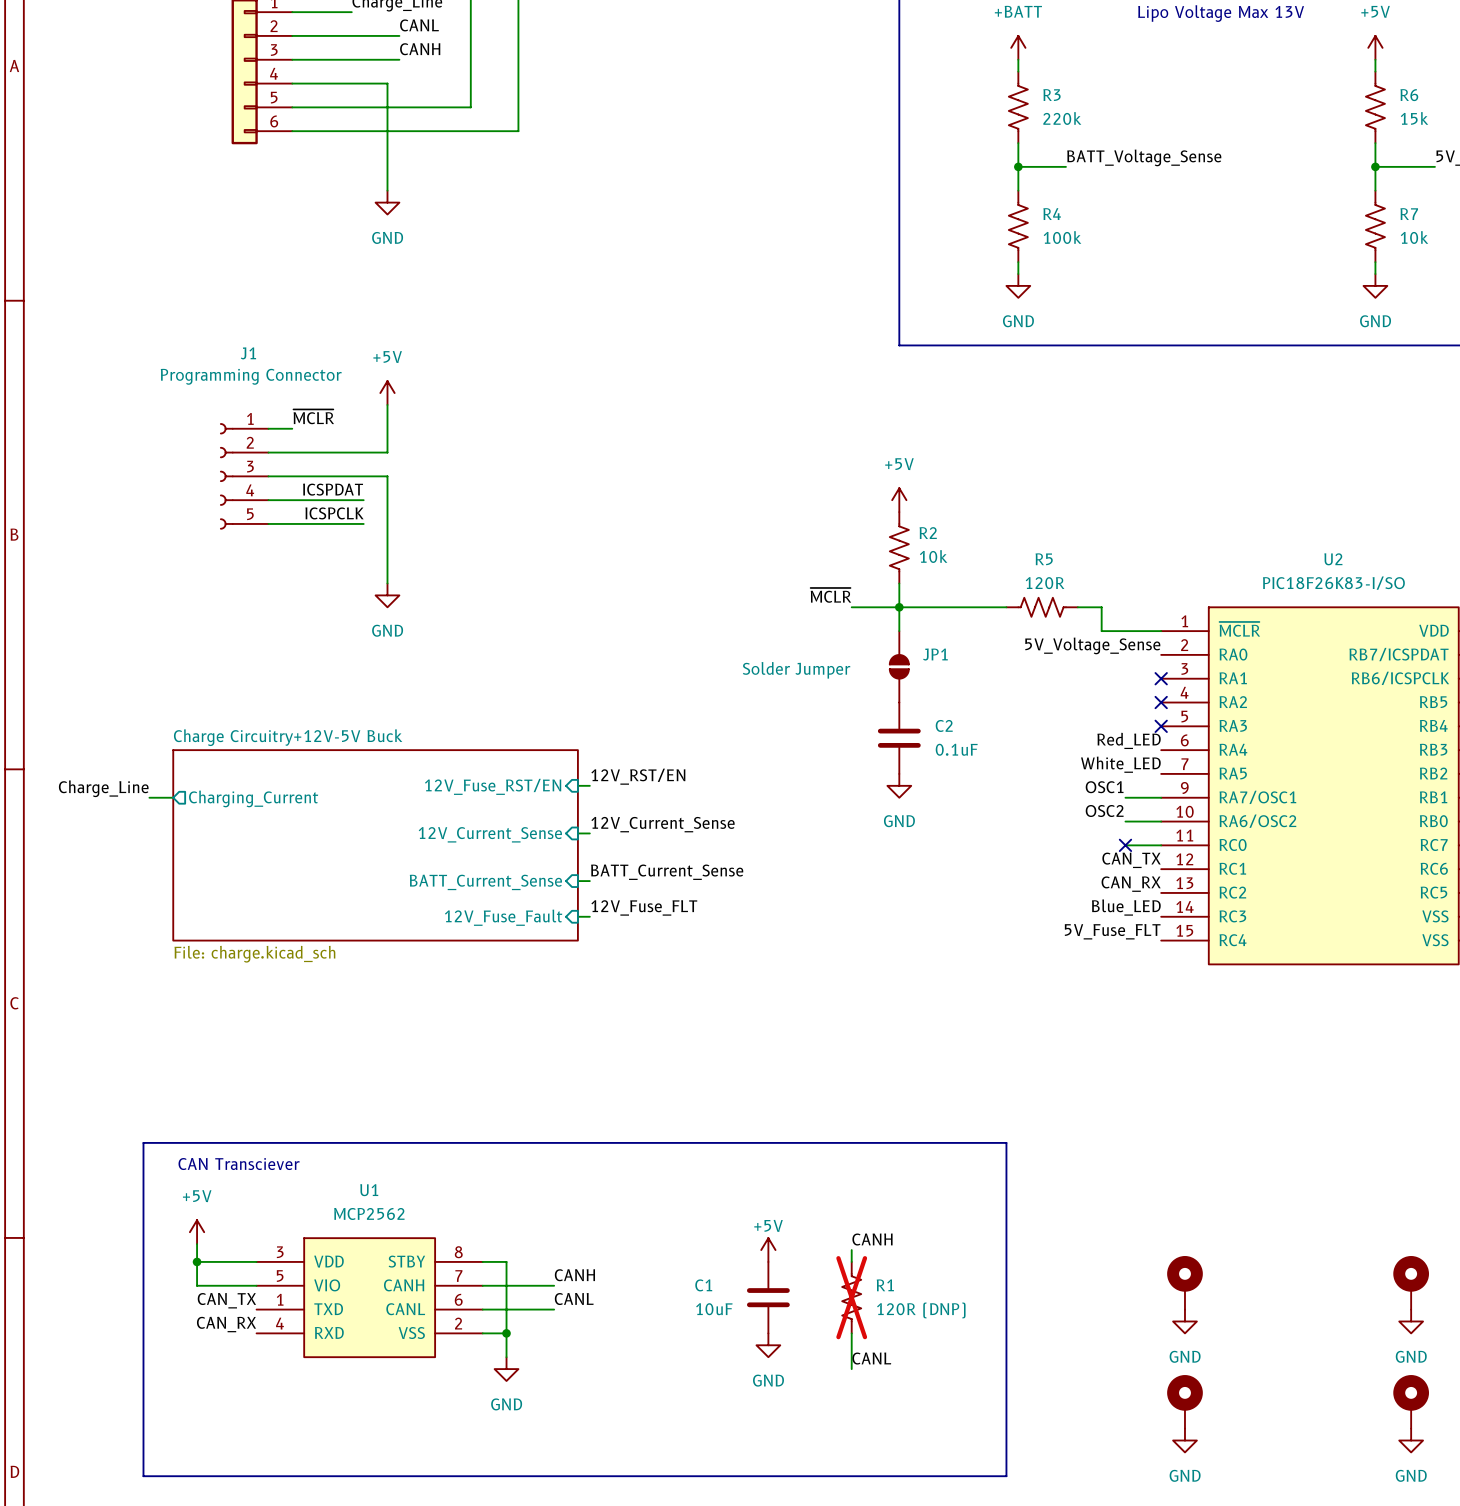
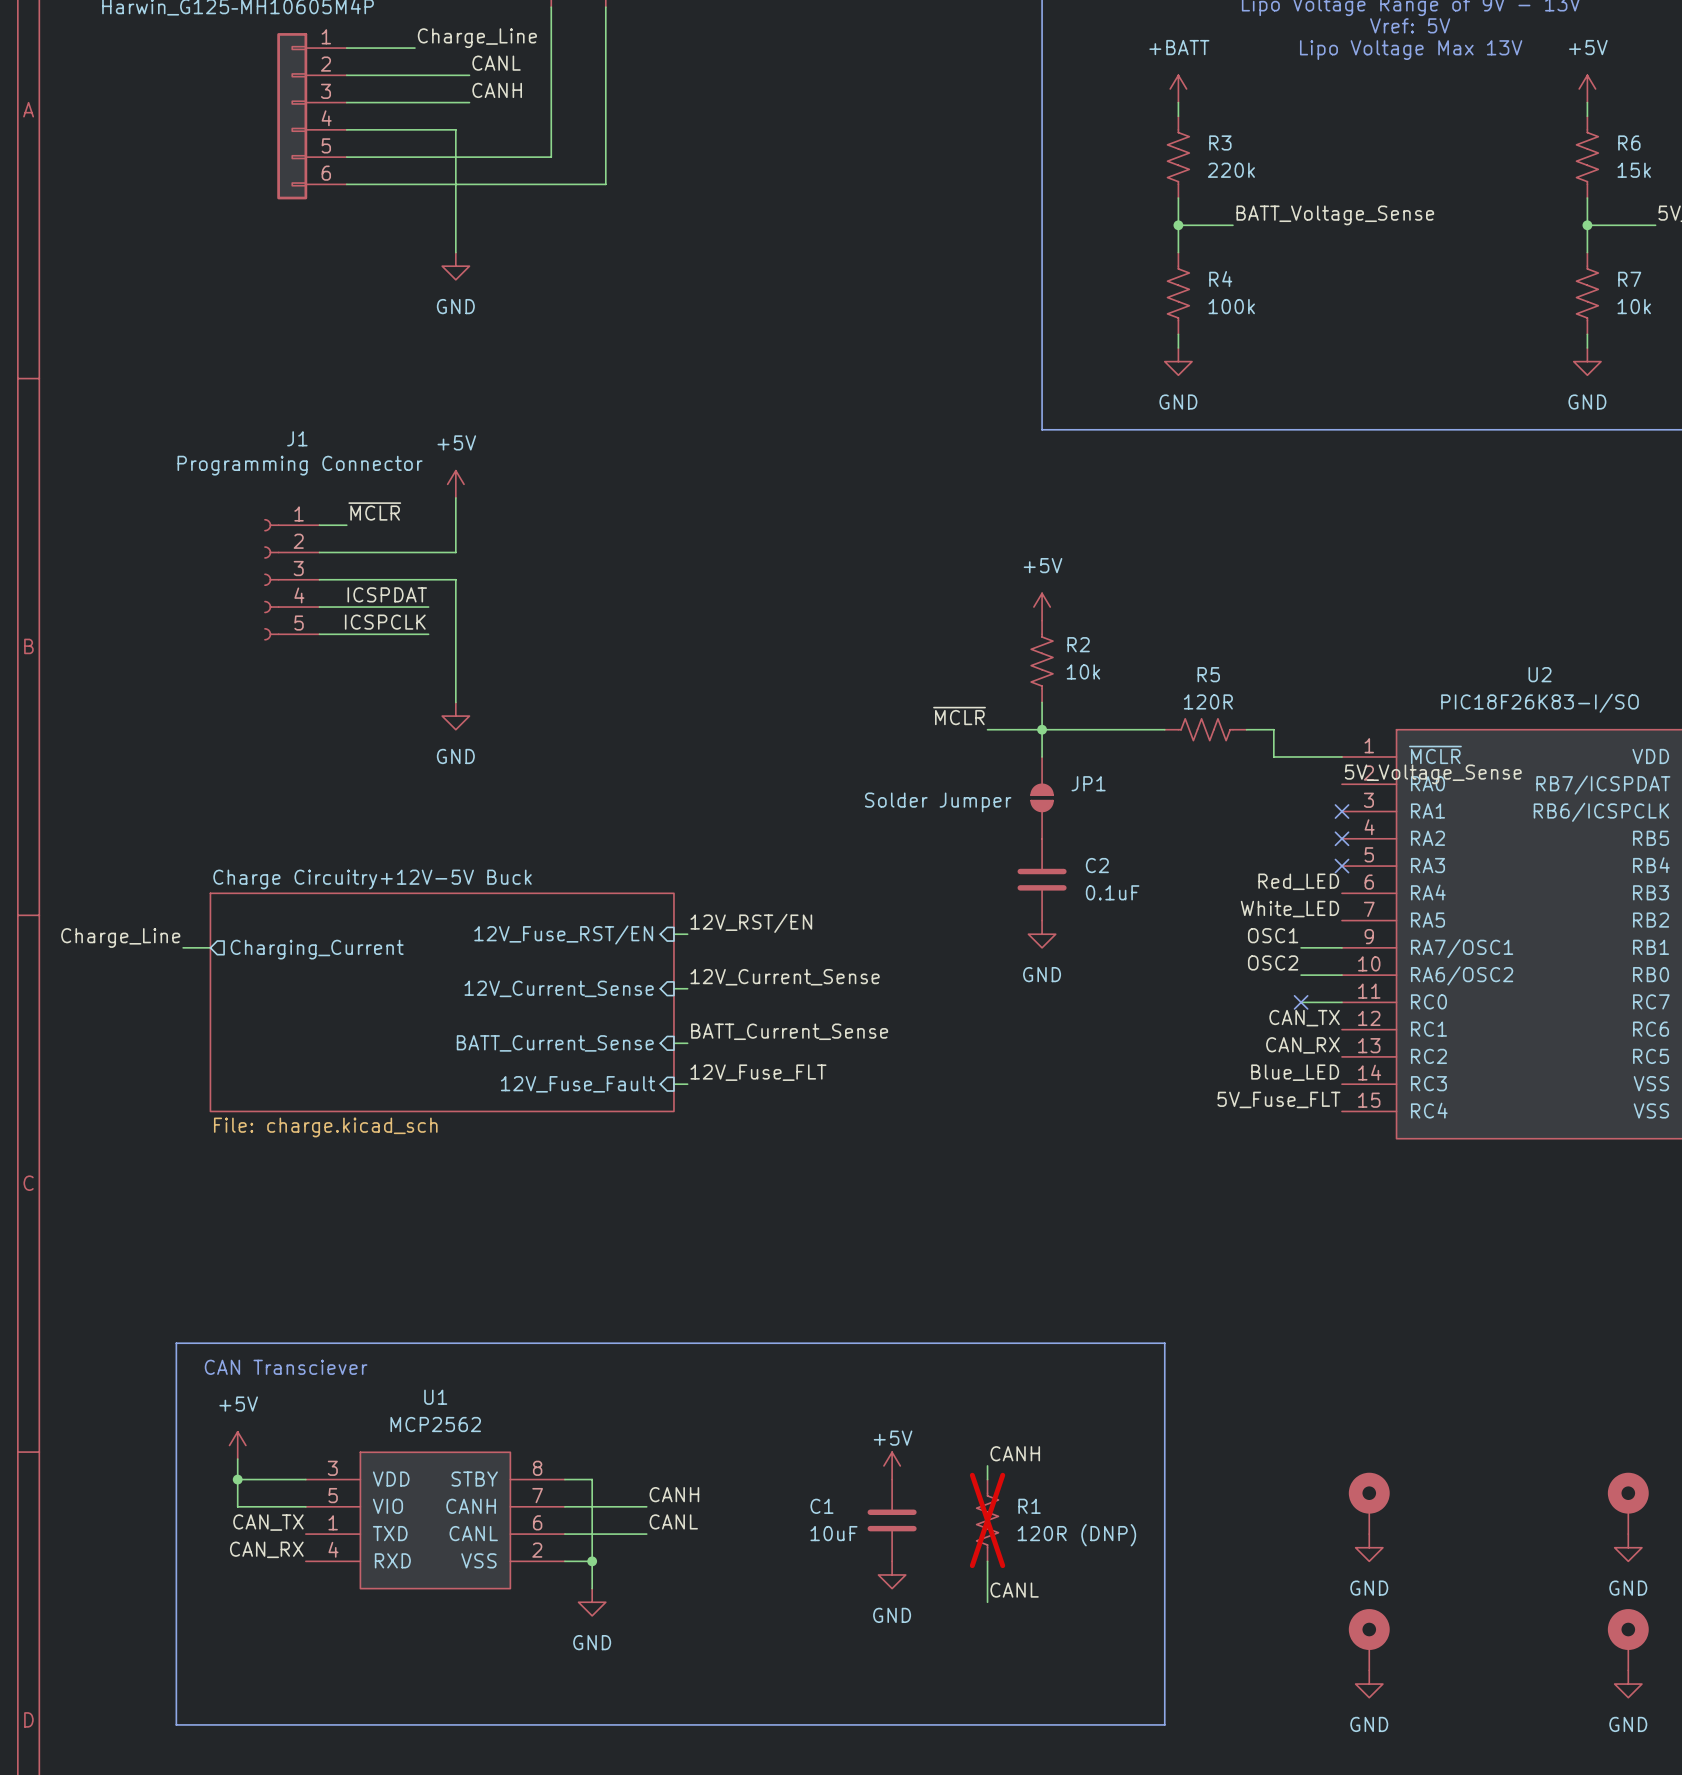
label position: 5V_Voltage_Sense (1092, 645) -> 5V_Voltage_Sense (1433, 774)

